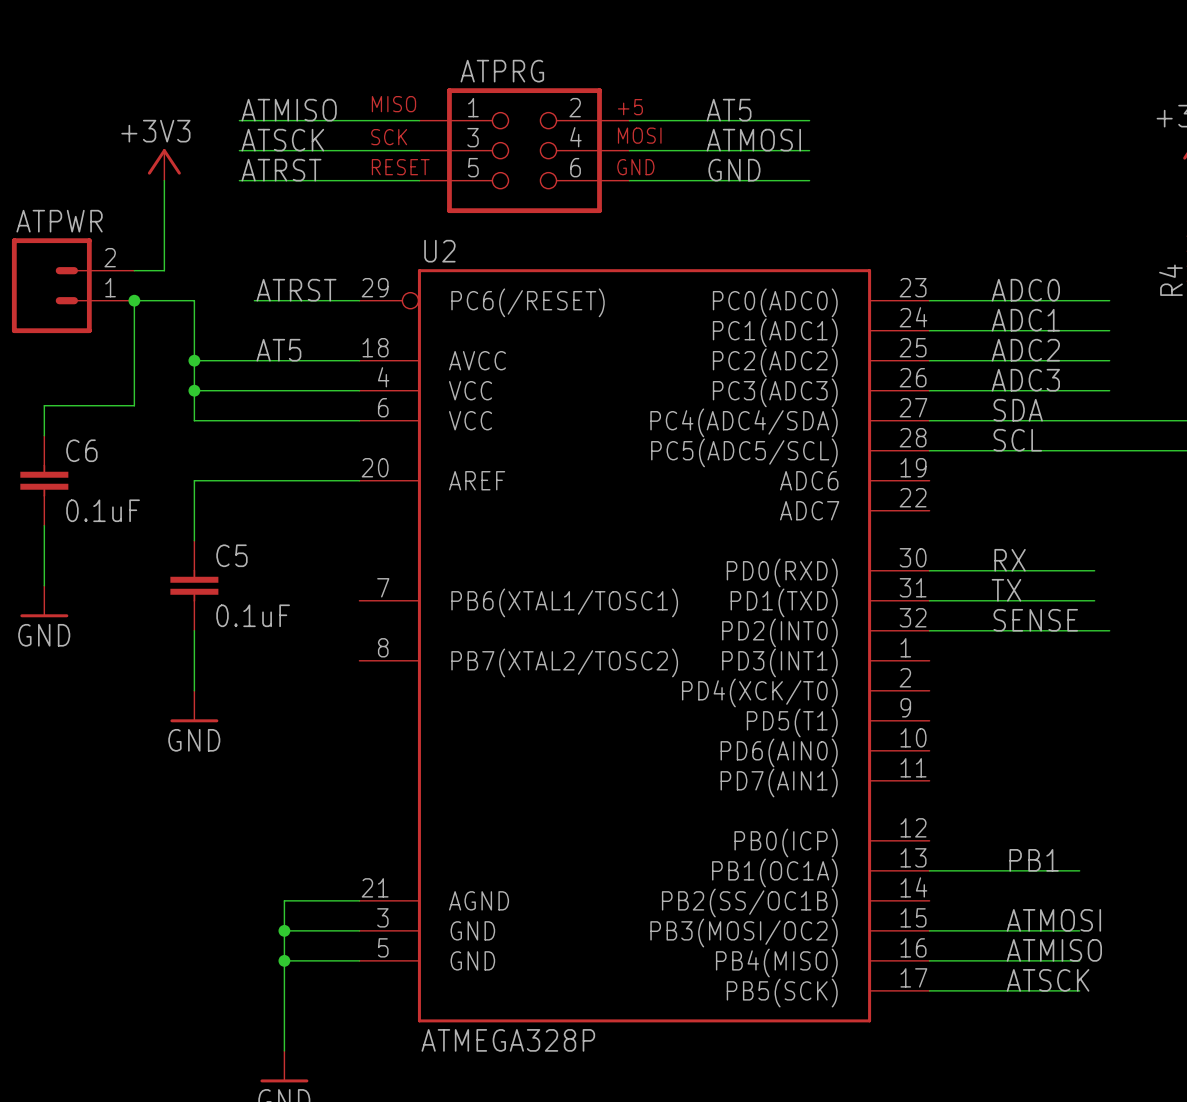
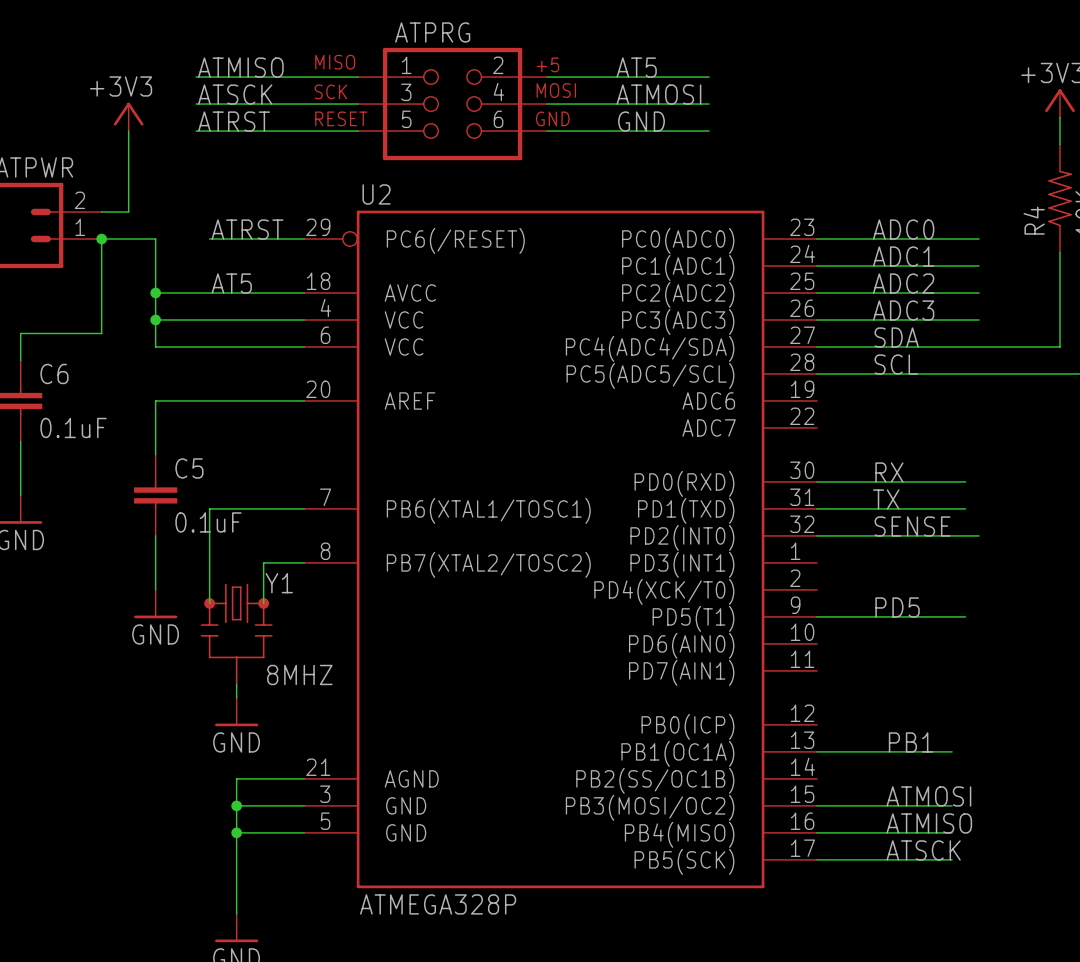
wire: none -> (304, 508) (209, 508) (209, 603)
wire: none -> (304, 562) (263, 562) (263, 603)
label: none -> PD5 (897, 607)
wire: none -> (817, 616) (965, 616)
Y1: none -> 8MHZ (236, 634)
wire: none -> (236, 684) (236, 697)
power symbol: none -> GND (236, 712)

